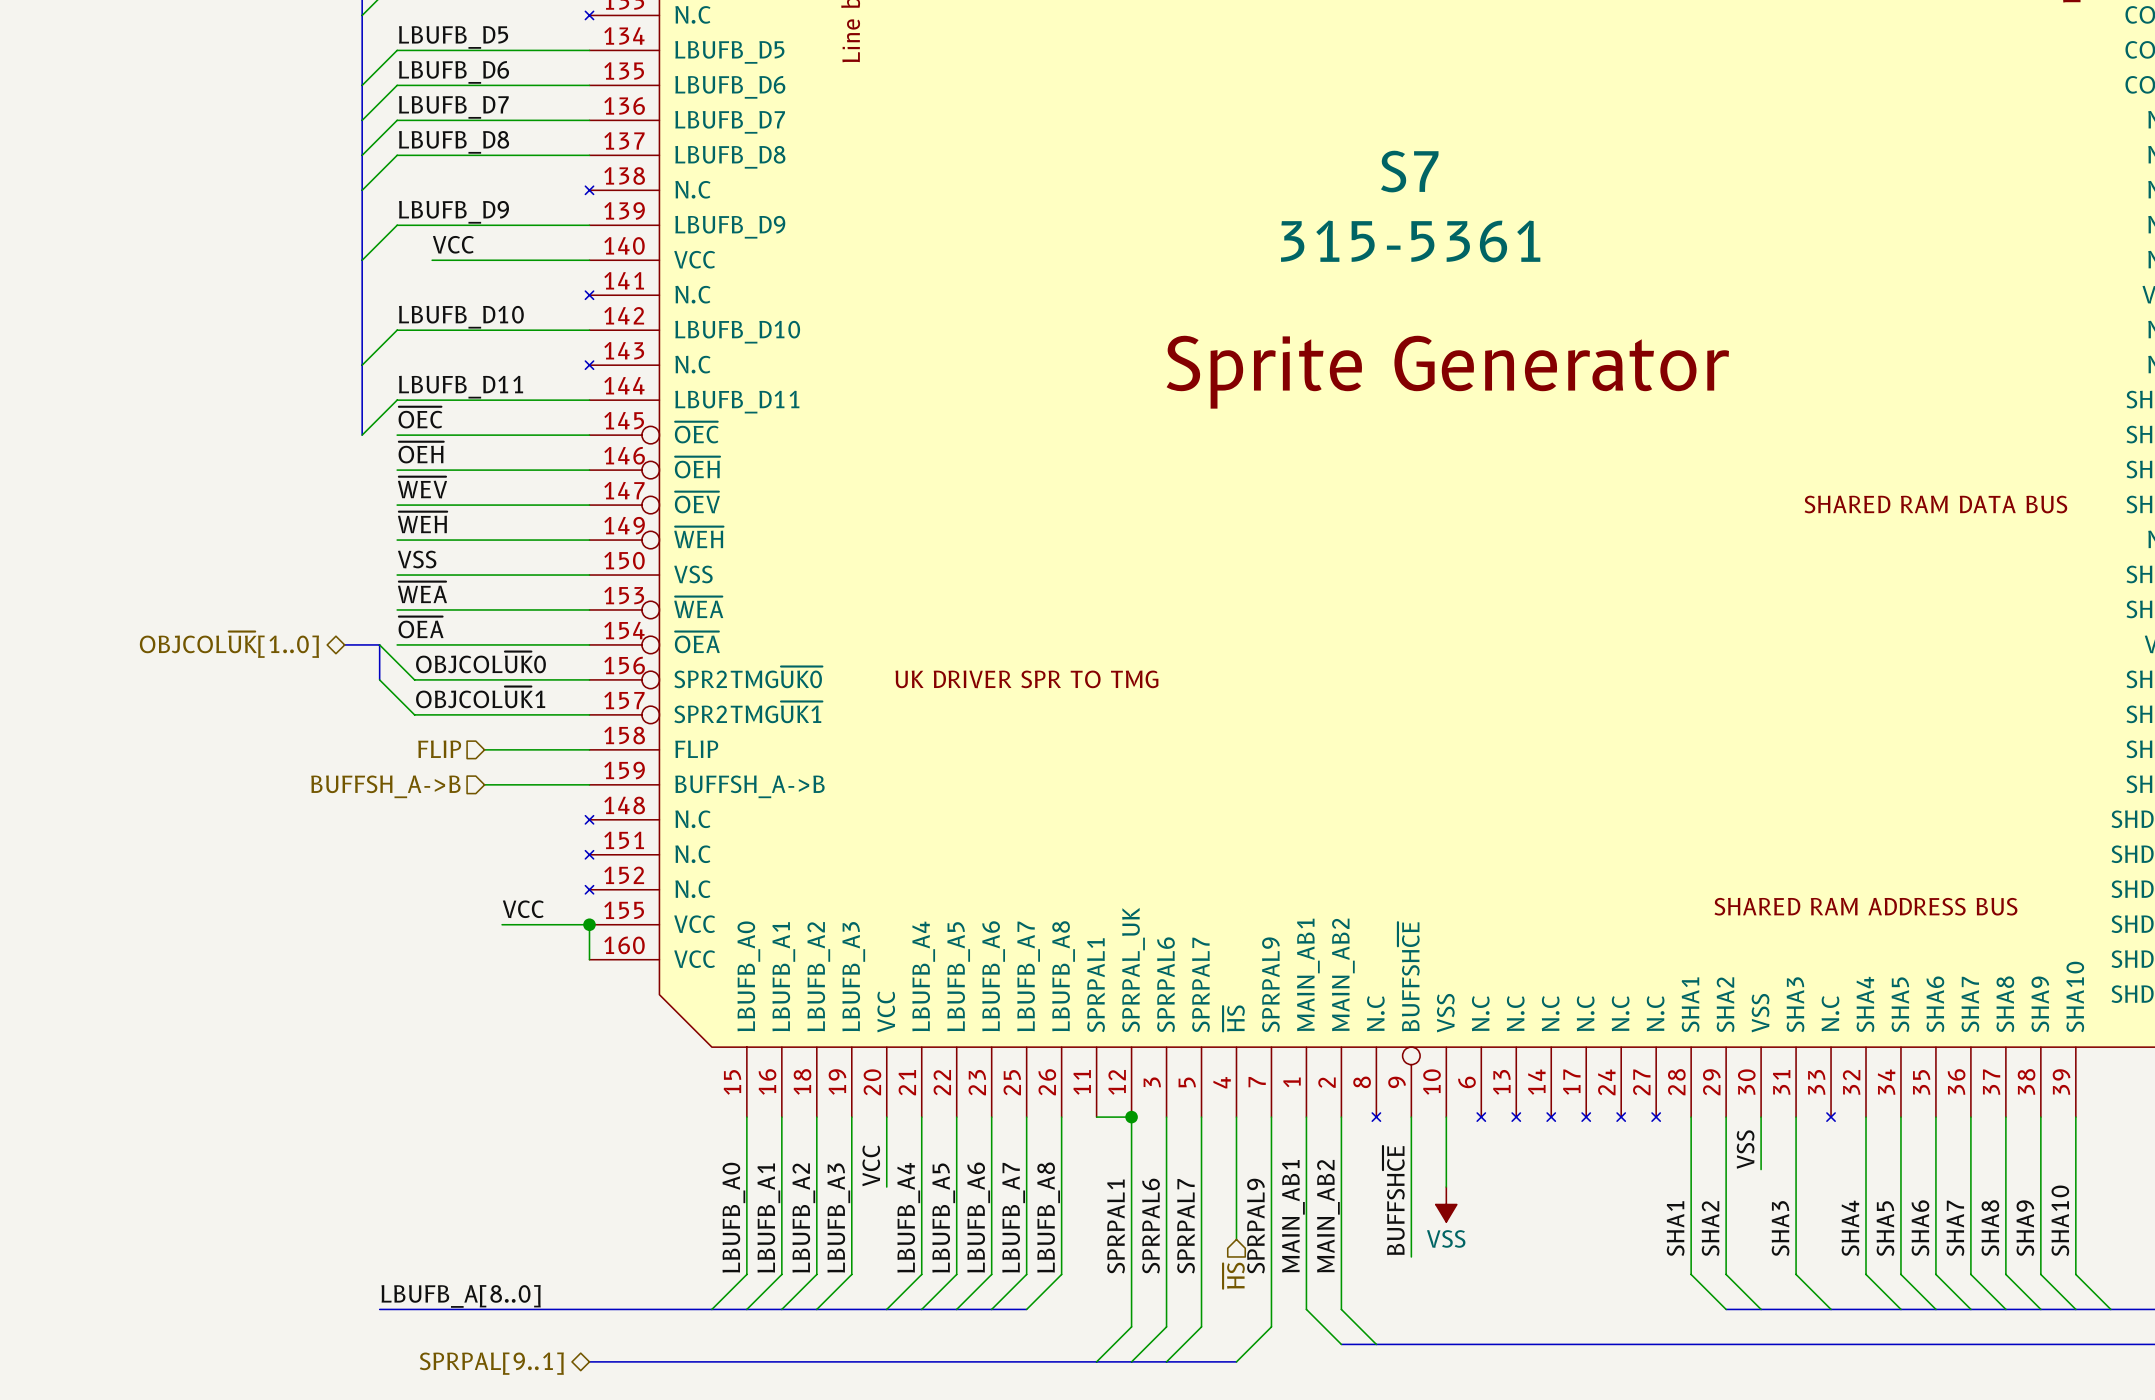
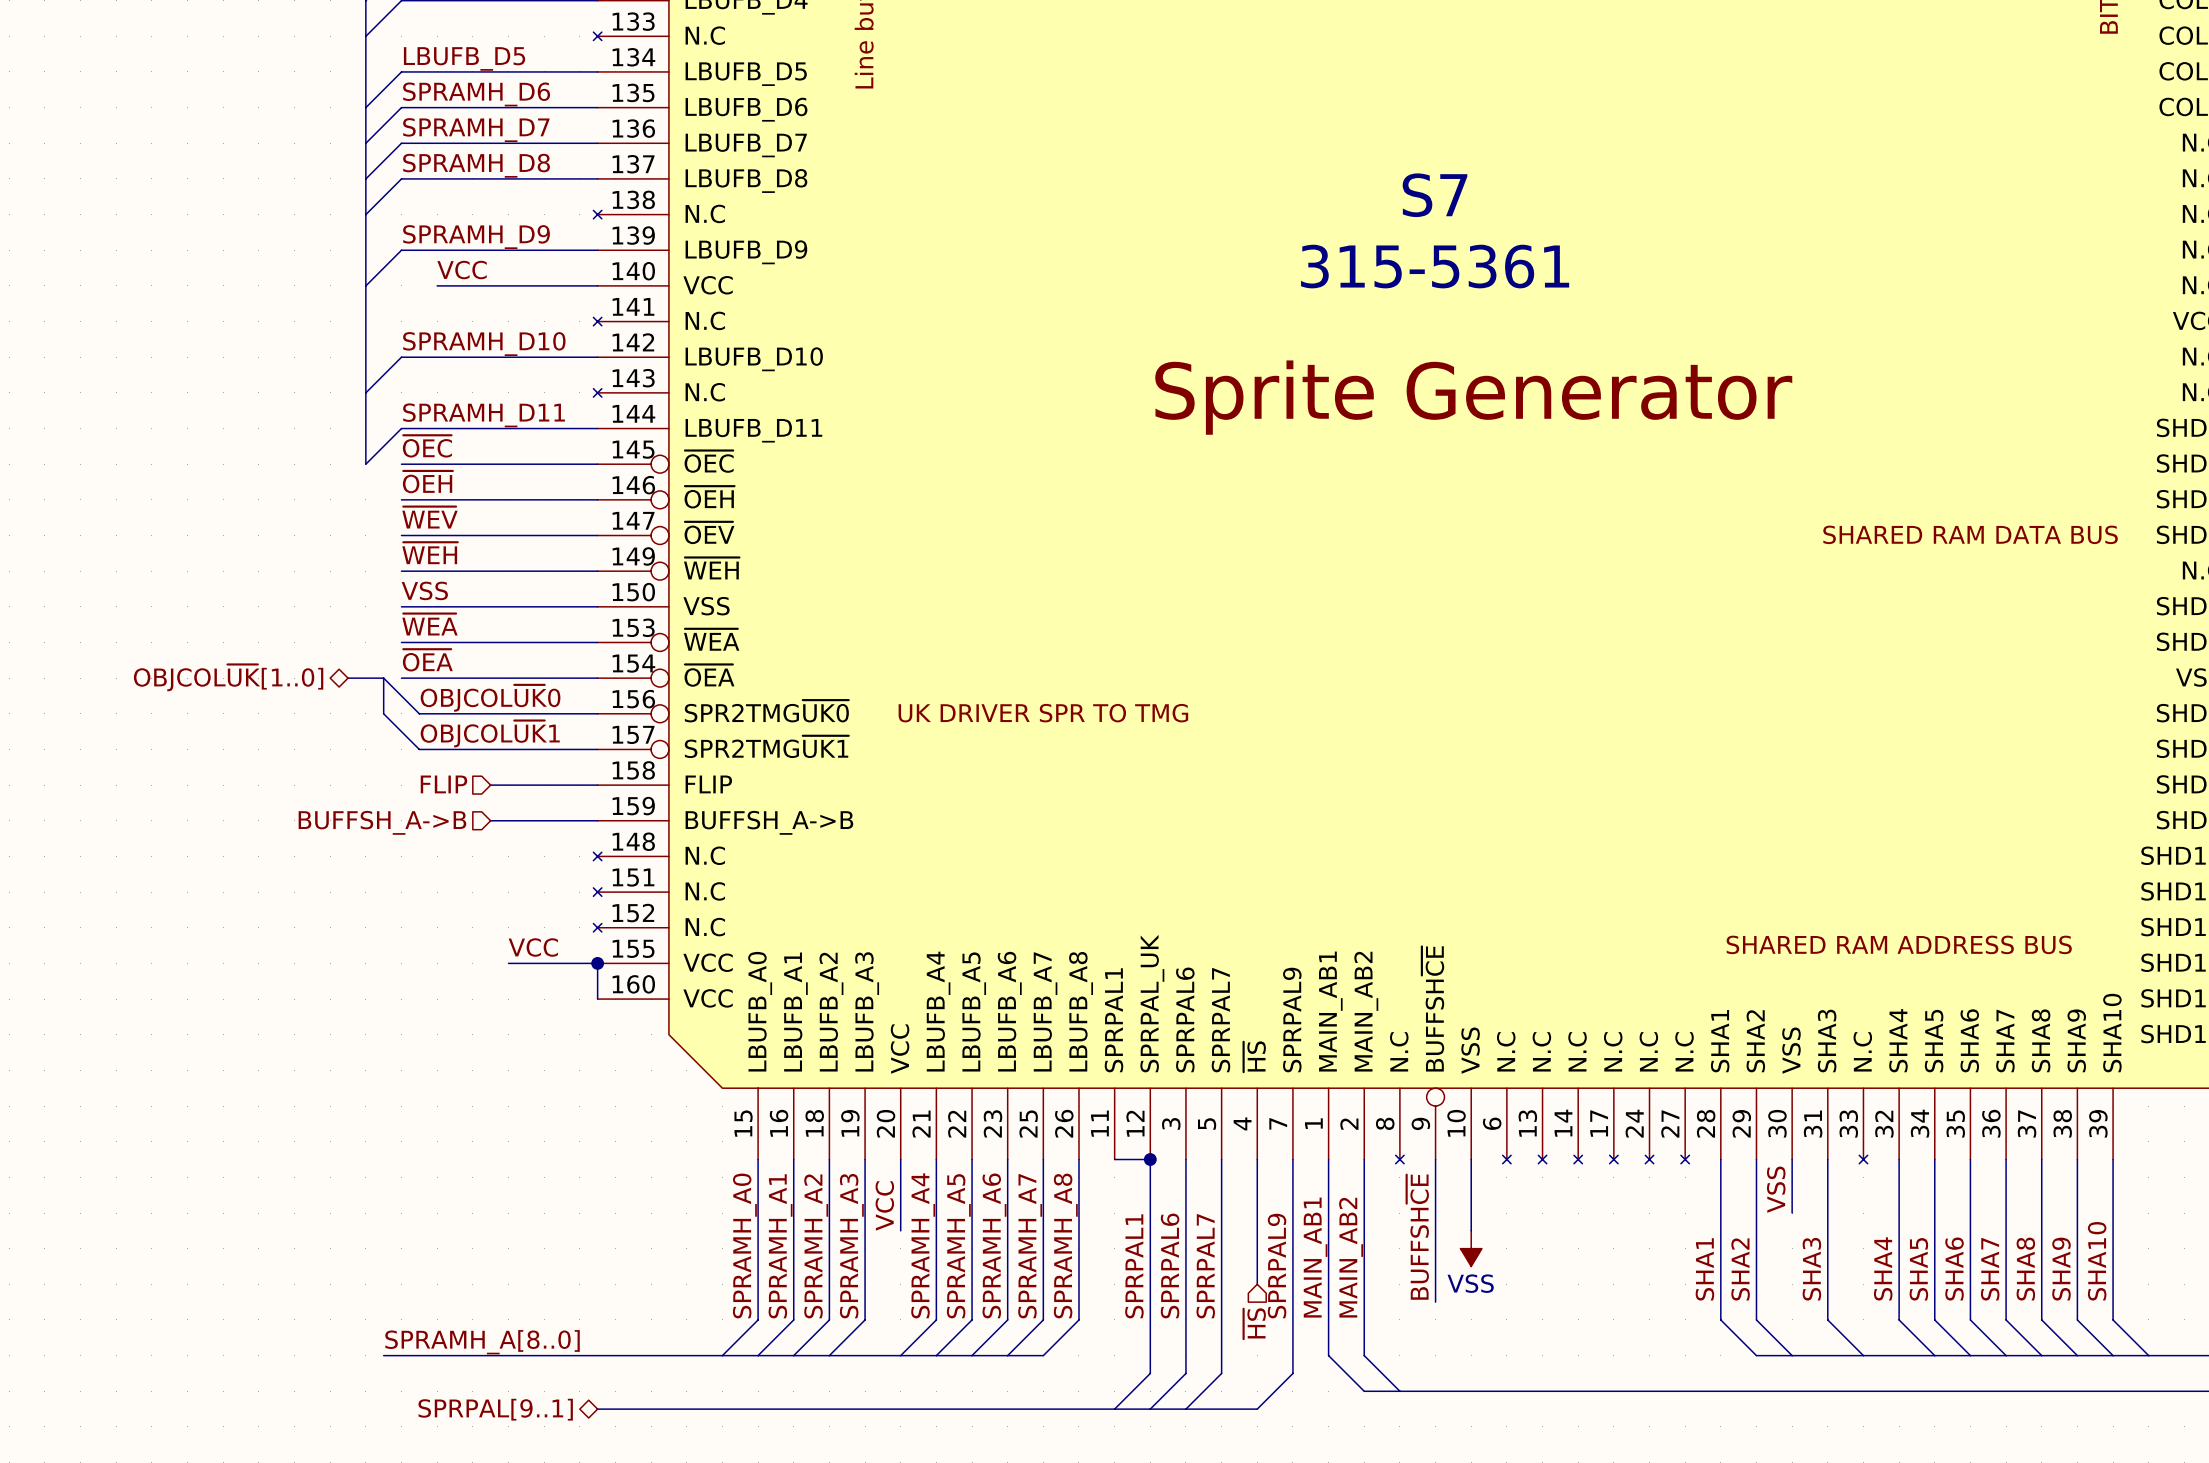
label: LBUFB_D6 (454, 72) -> SPRAMH_D6 (476, 94)
label: LBUFB_D7 (453, 107) -> SPRAMH_D7 (476, 130)
label: LBUFB_D8 (454, 142) -> SPRAMH_D8 (476, 165)
label: LBUFB_D9 (453, 212) -> SPRAMH_D9 (476, 237)
label: LBUFB_D10 (461, 317) -> SPRAMH_D10 (484, 344)
label: LBUFB_D11 (461, 387) -> SPRAMH_D11 (484, 415)
label: LBUFB_A0 (733, 1217) -> SPRAMH_A0 (744, 1245)
label: LBUFB_A3 (838, 1217) -> SPRAMH_A3 (851, 1246)
label: LBUFB_A4 (908, 1217) -> SPRAMH_A4 (923, 1245)
label: LBUFB_A6 (978, 1217) -> SPRAMH_A6 (994, 1245)
label: LBUFB_A7 (1013, 1217) -> SPRAMH_A7 (1030, 1246)
label: LBUFB_A8 (1048, 1217) -> SPRAMH_A8 (1065, 1246)
label: LBUFB_A1 (768, 1218) -> SPRAMH_A1 (780, 1246)
label: LBUFB_A2 (803, 1218) -> SPRAMH_A2 (816, 1246)
label: LBUFB_A5 (943, 1218) -> SPRAMH_A5 (958, 1246)
label: LBUFB_A[8..0] (461, 1296) -> SPRAMH_A[8..0] (482, 1342)

